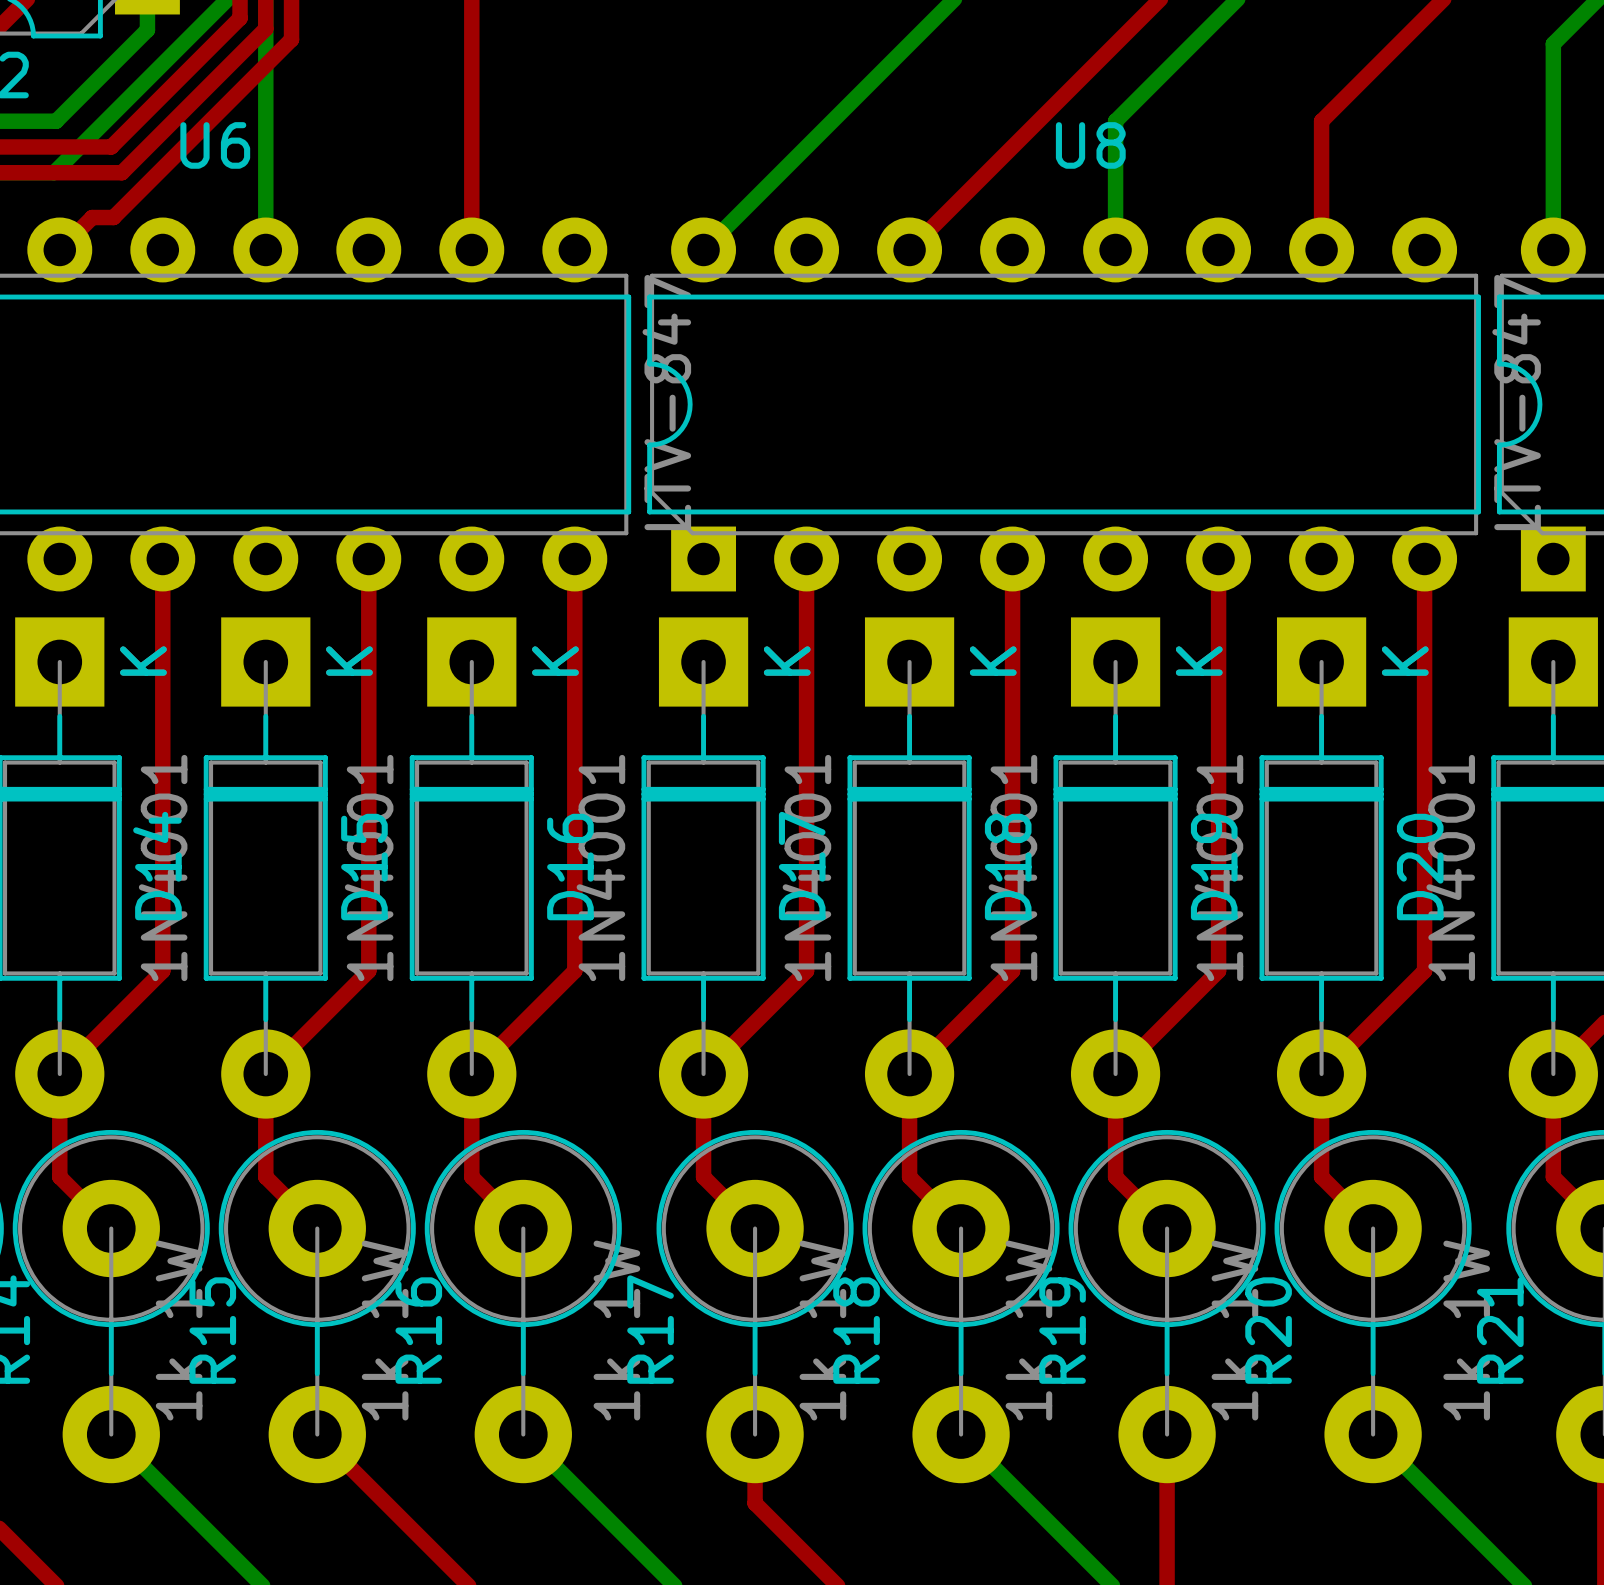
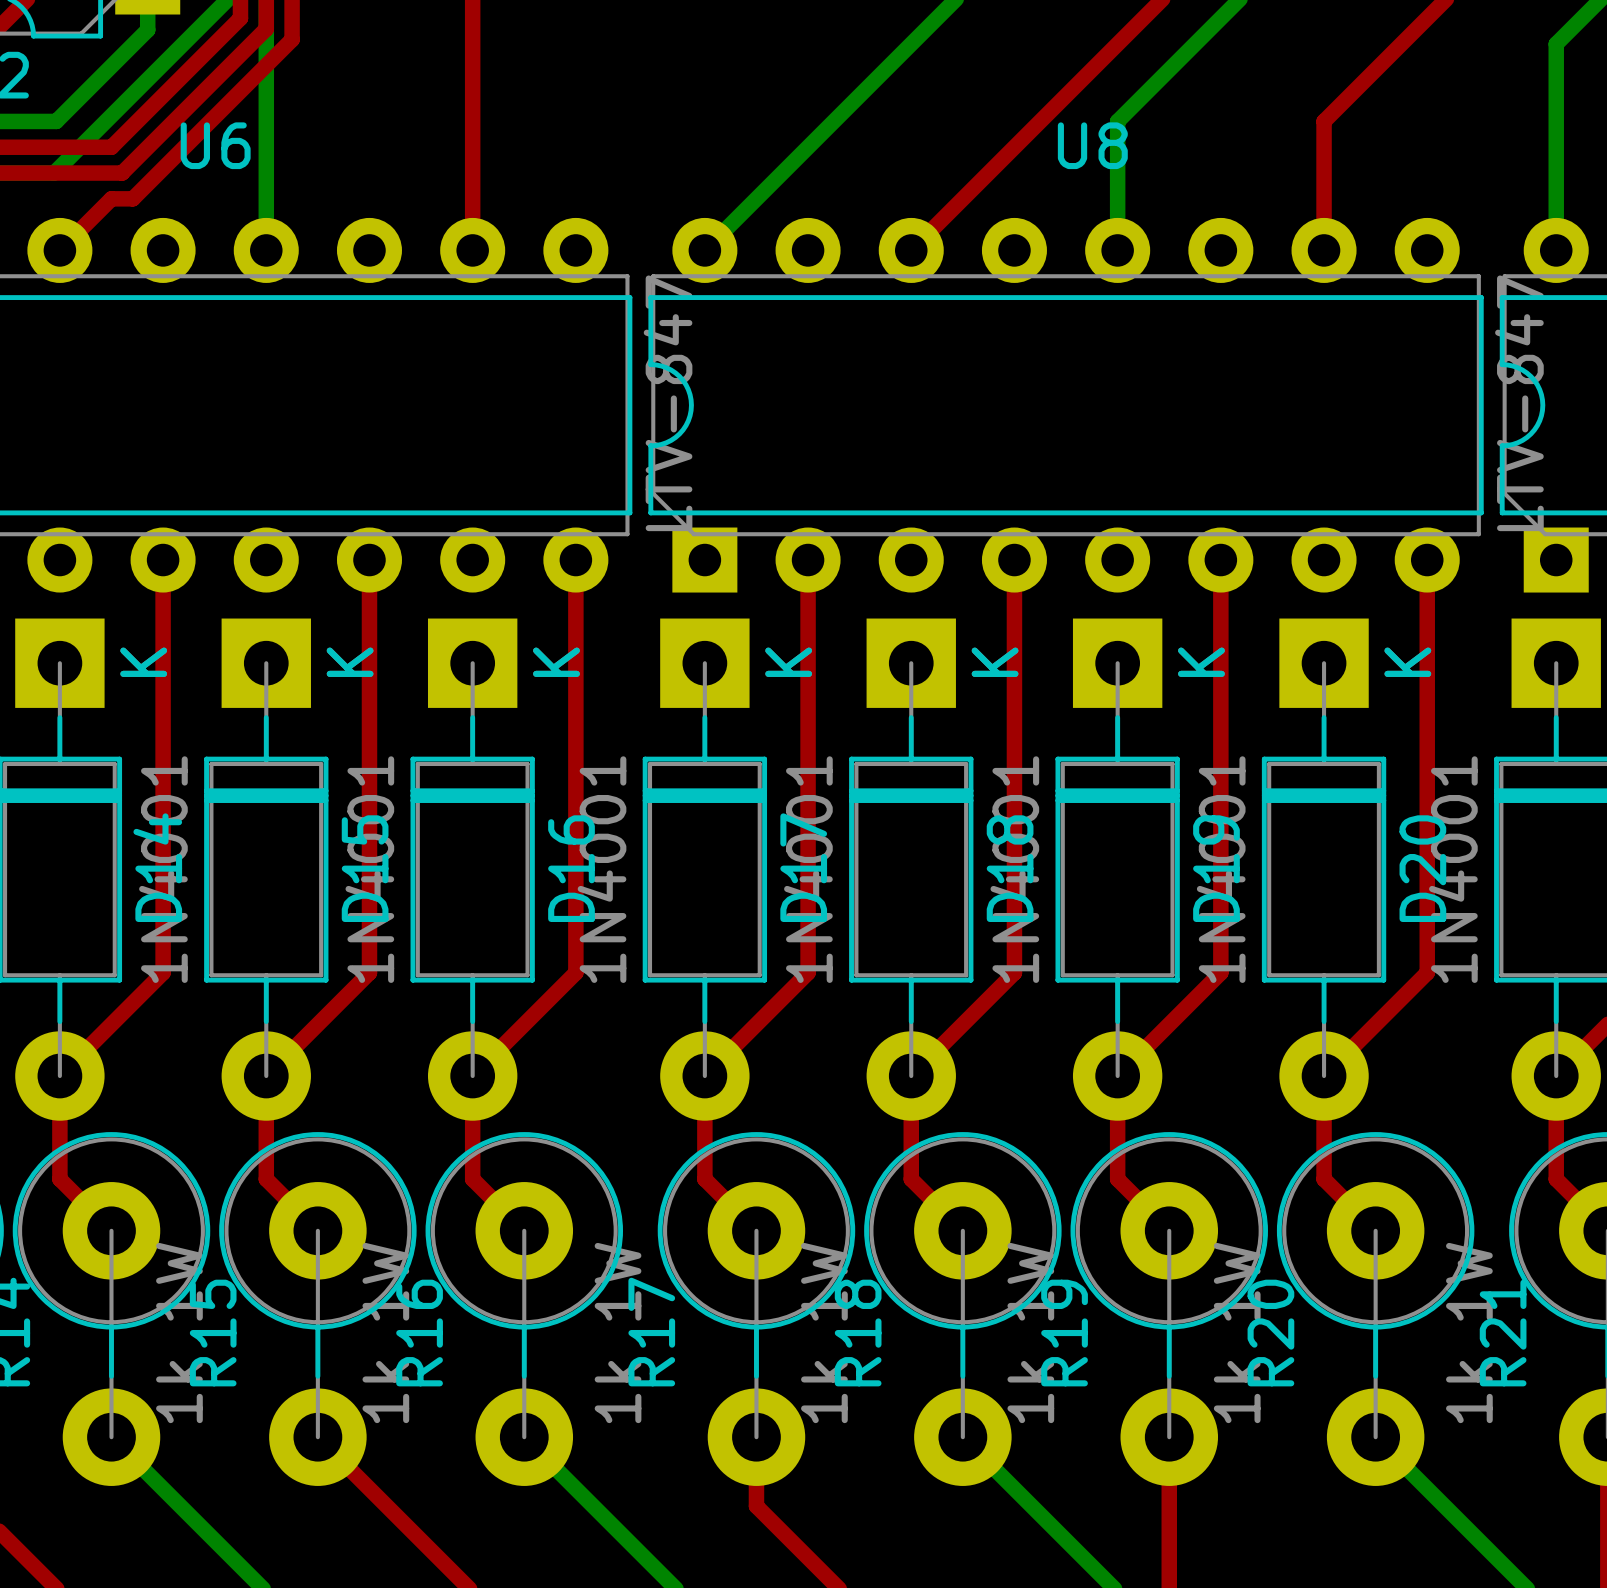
top track: (132, 198) (113, 217) (92, 217) -> (132, 198) (111, 198) (92, 217)

